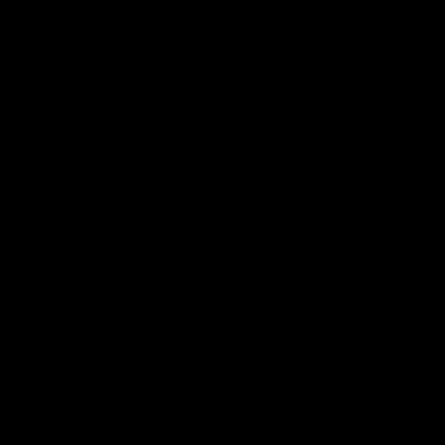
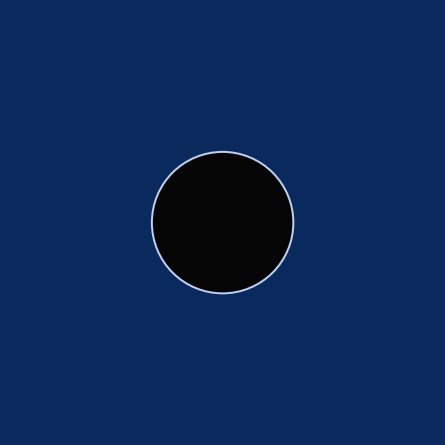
part: none -> (222, 222)

